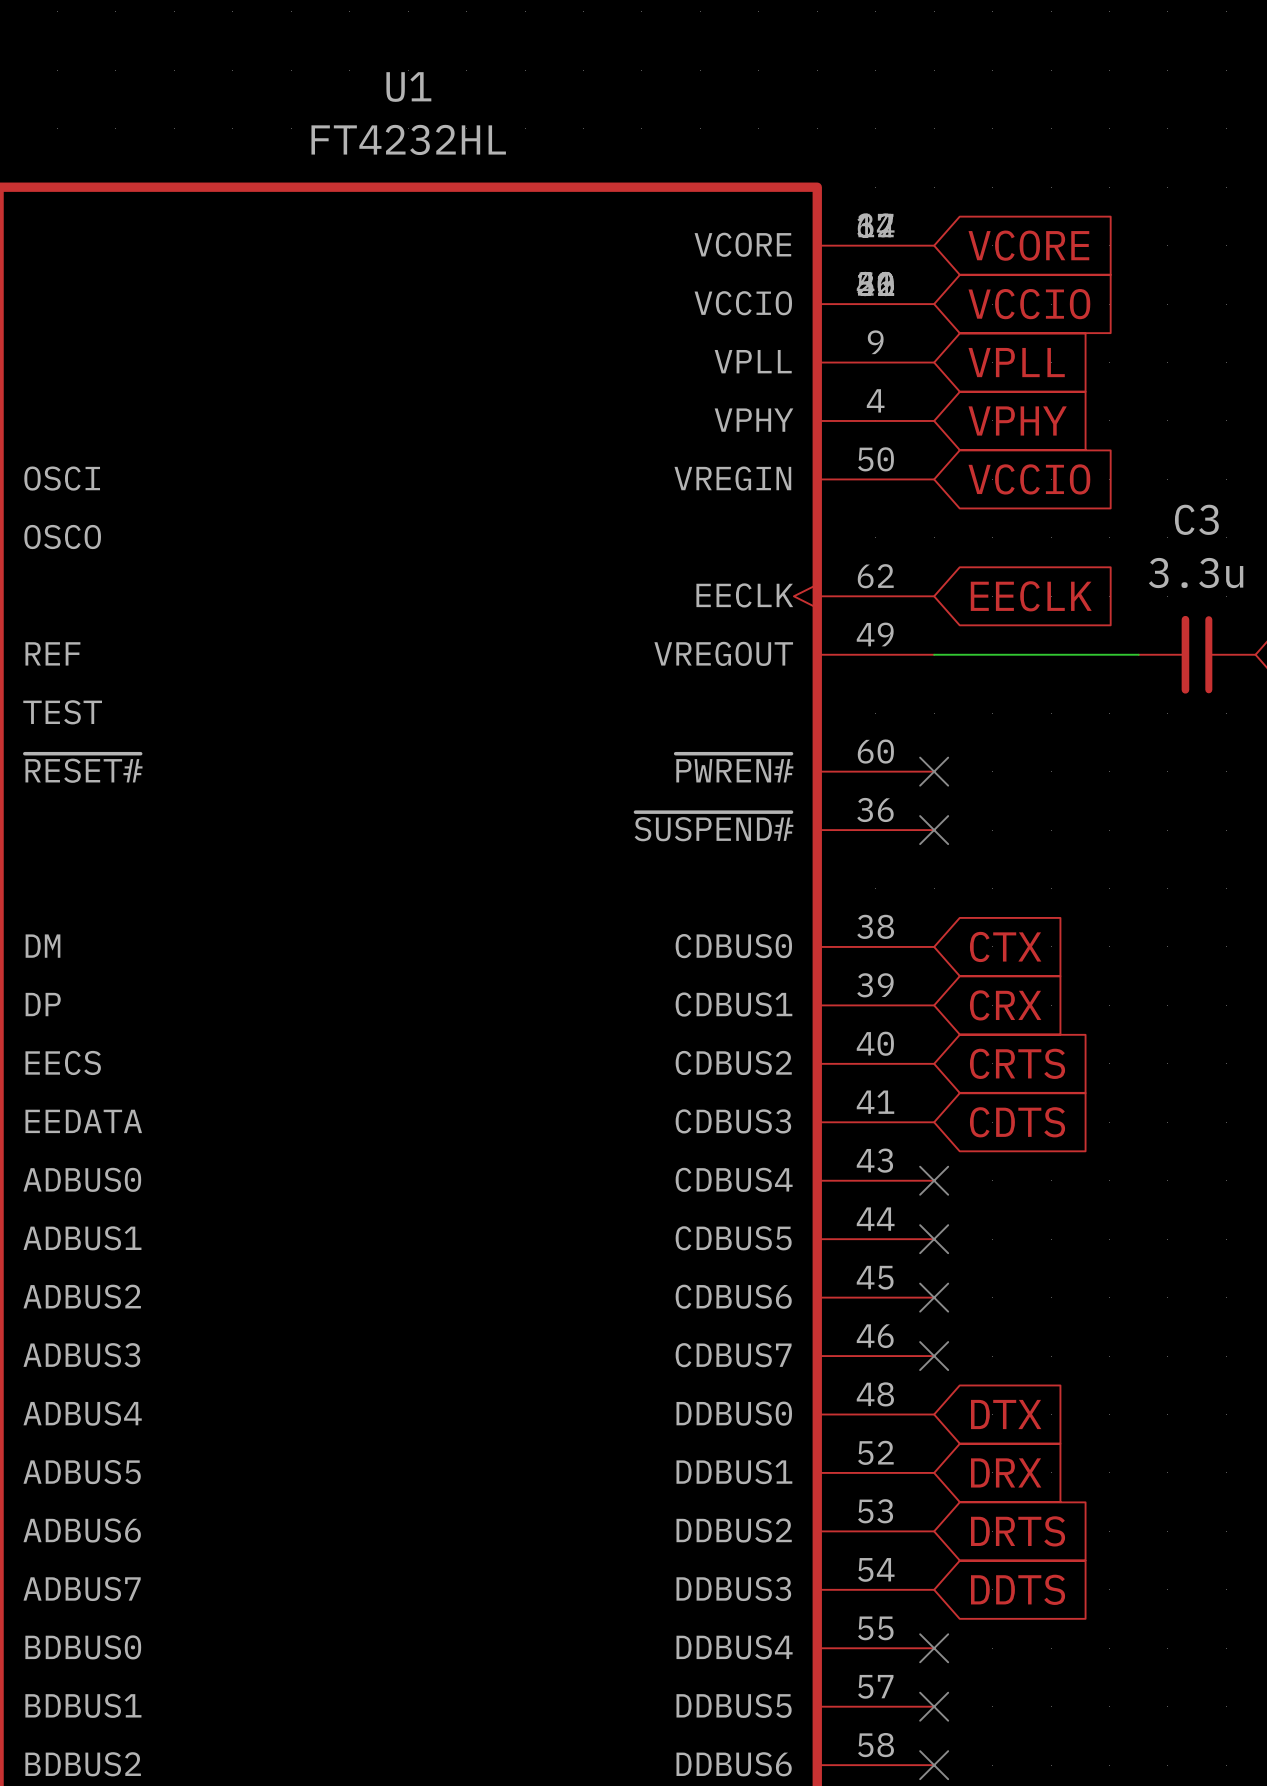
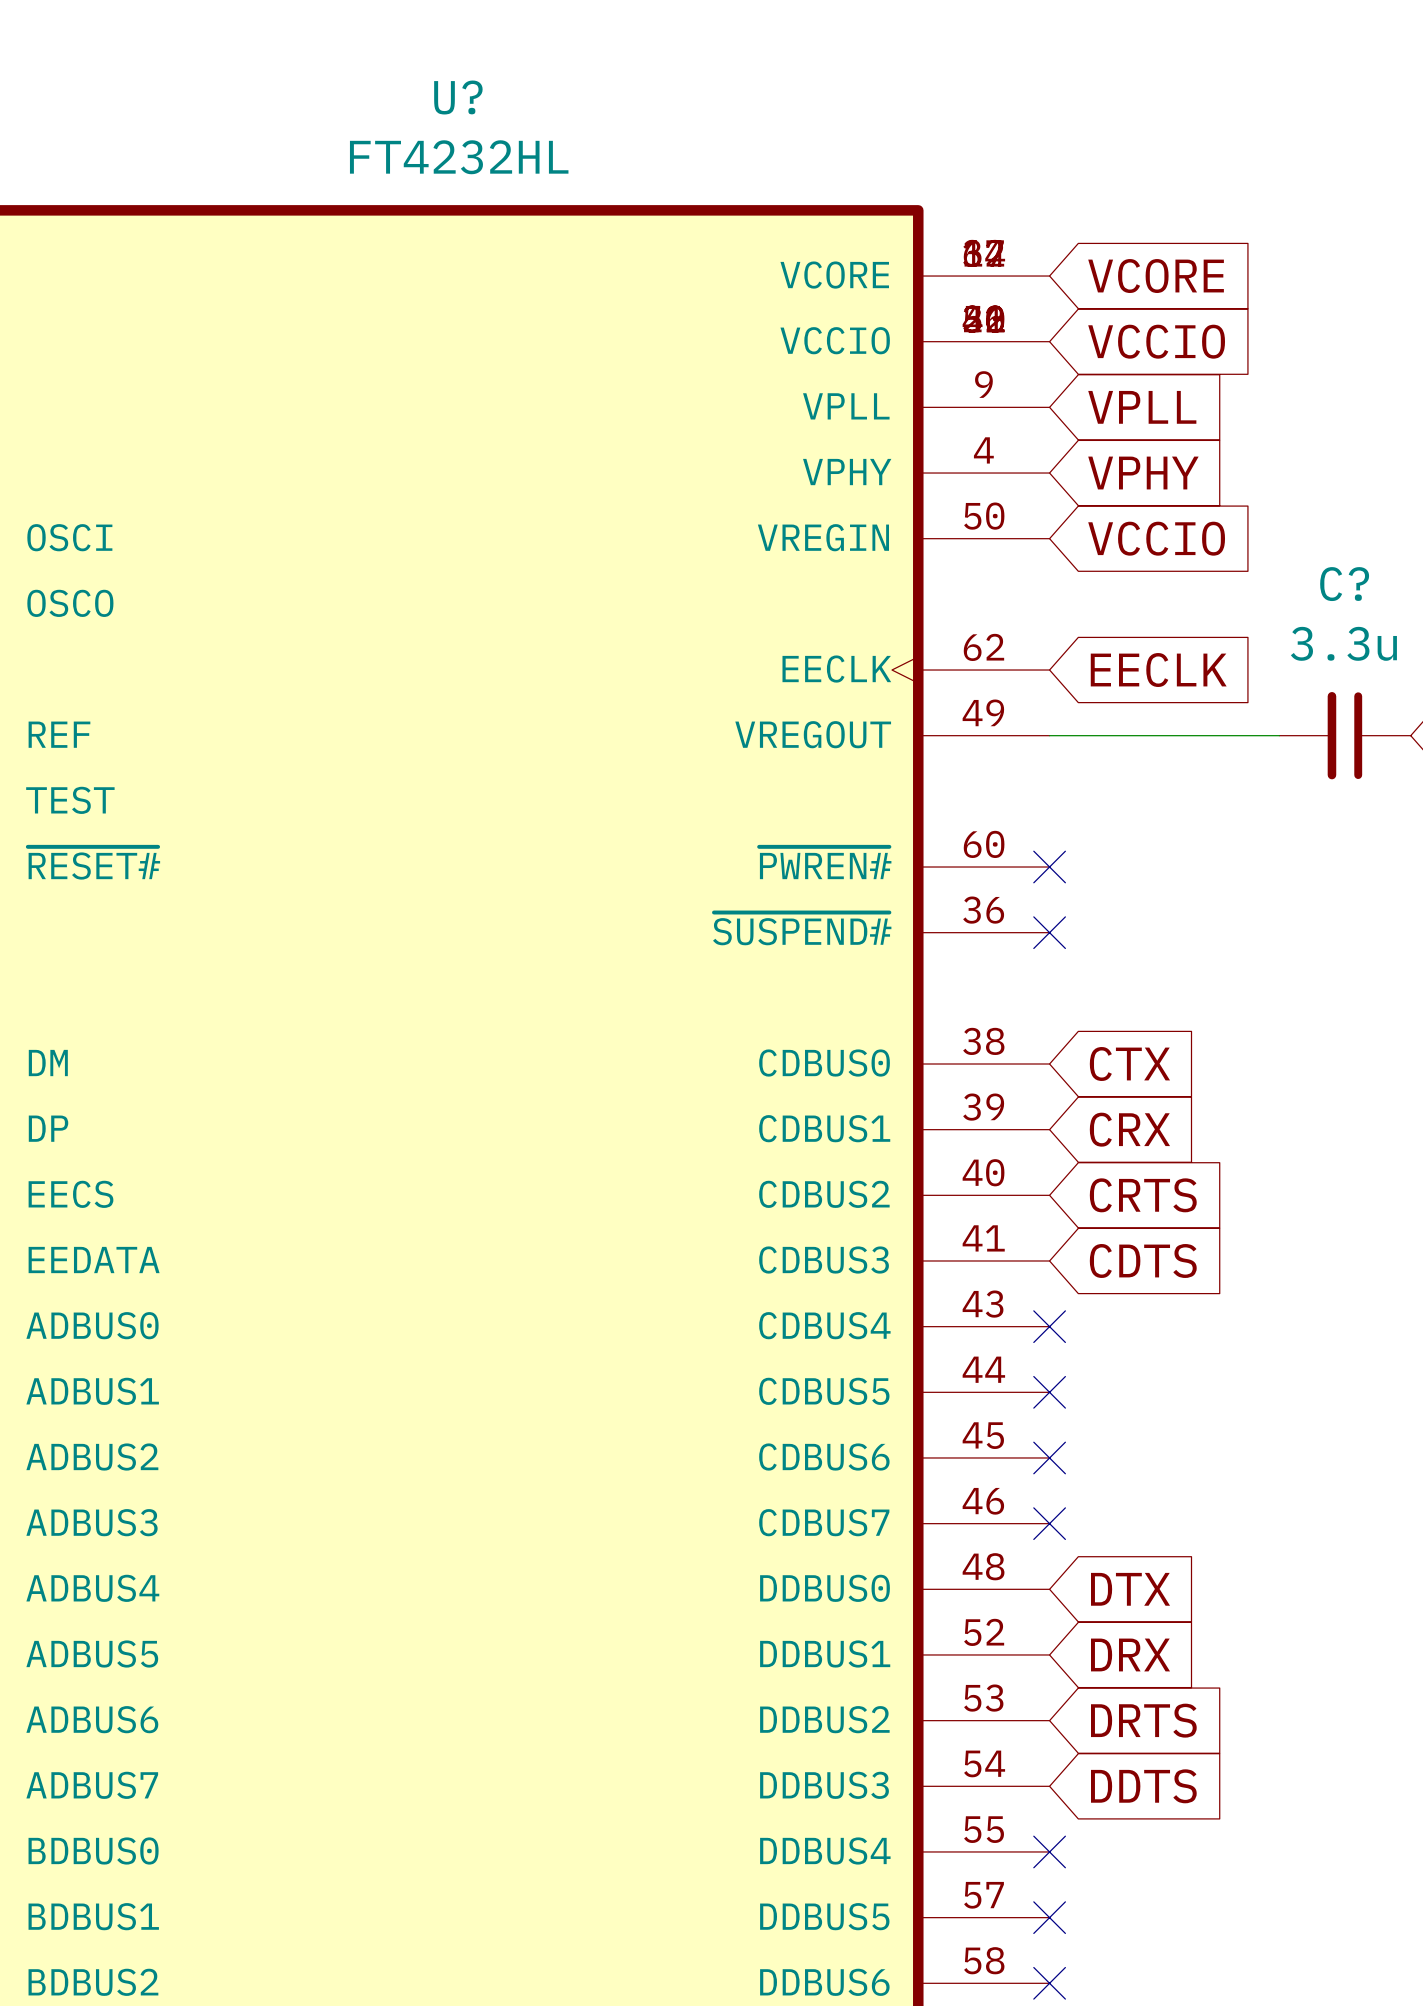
U1 name: U1 (408, 87) -> U? (458, 97)
C3 name: C3 (1196, 519) -> C? (1344, 584)

